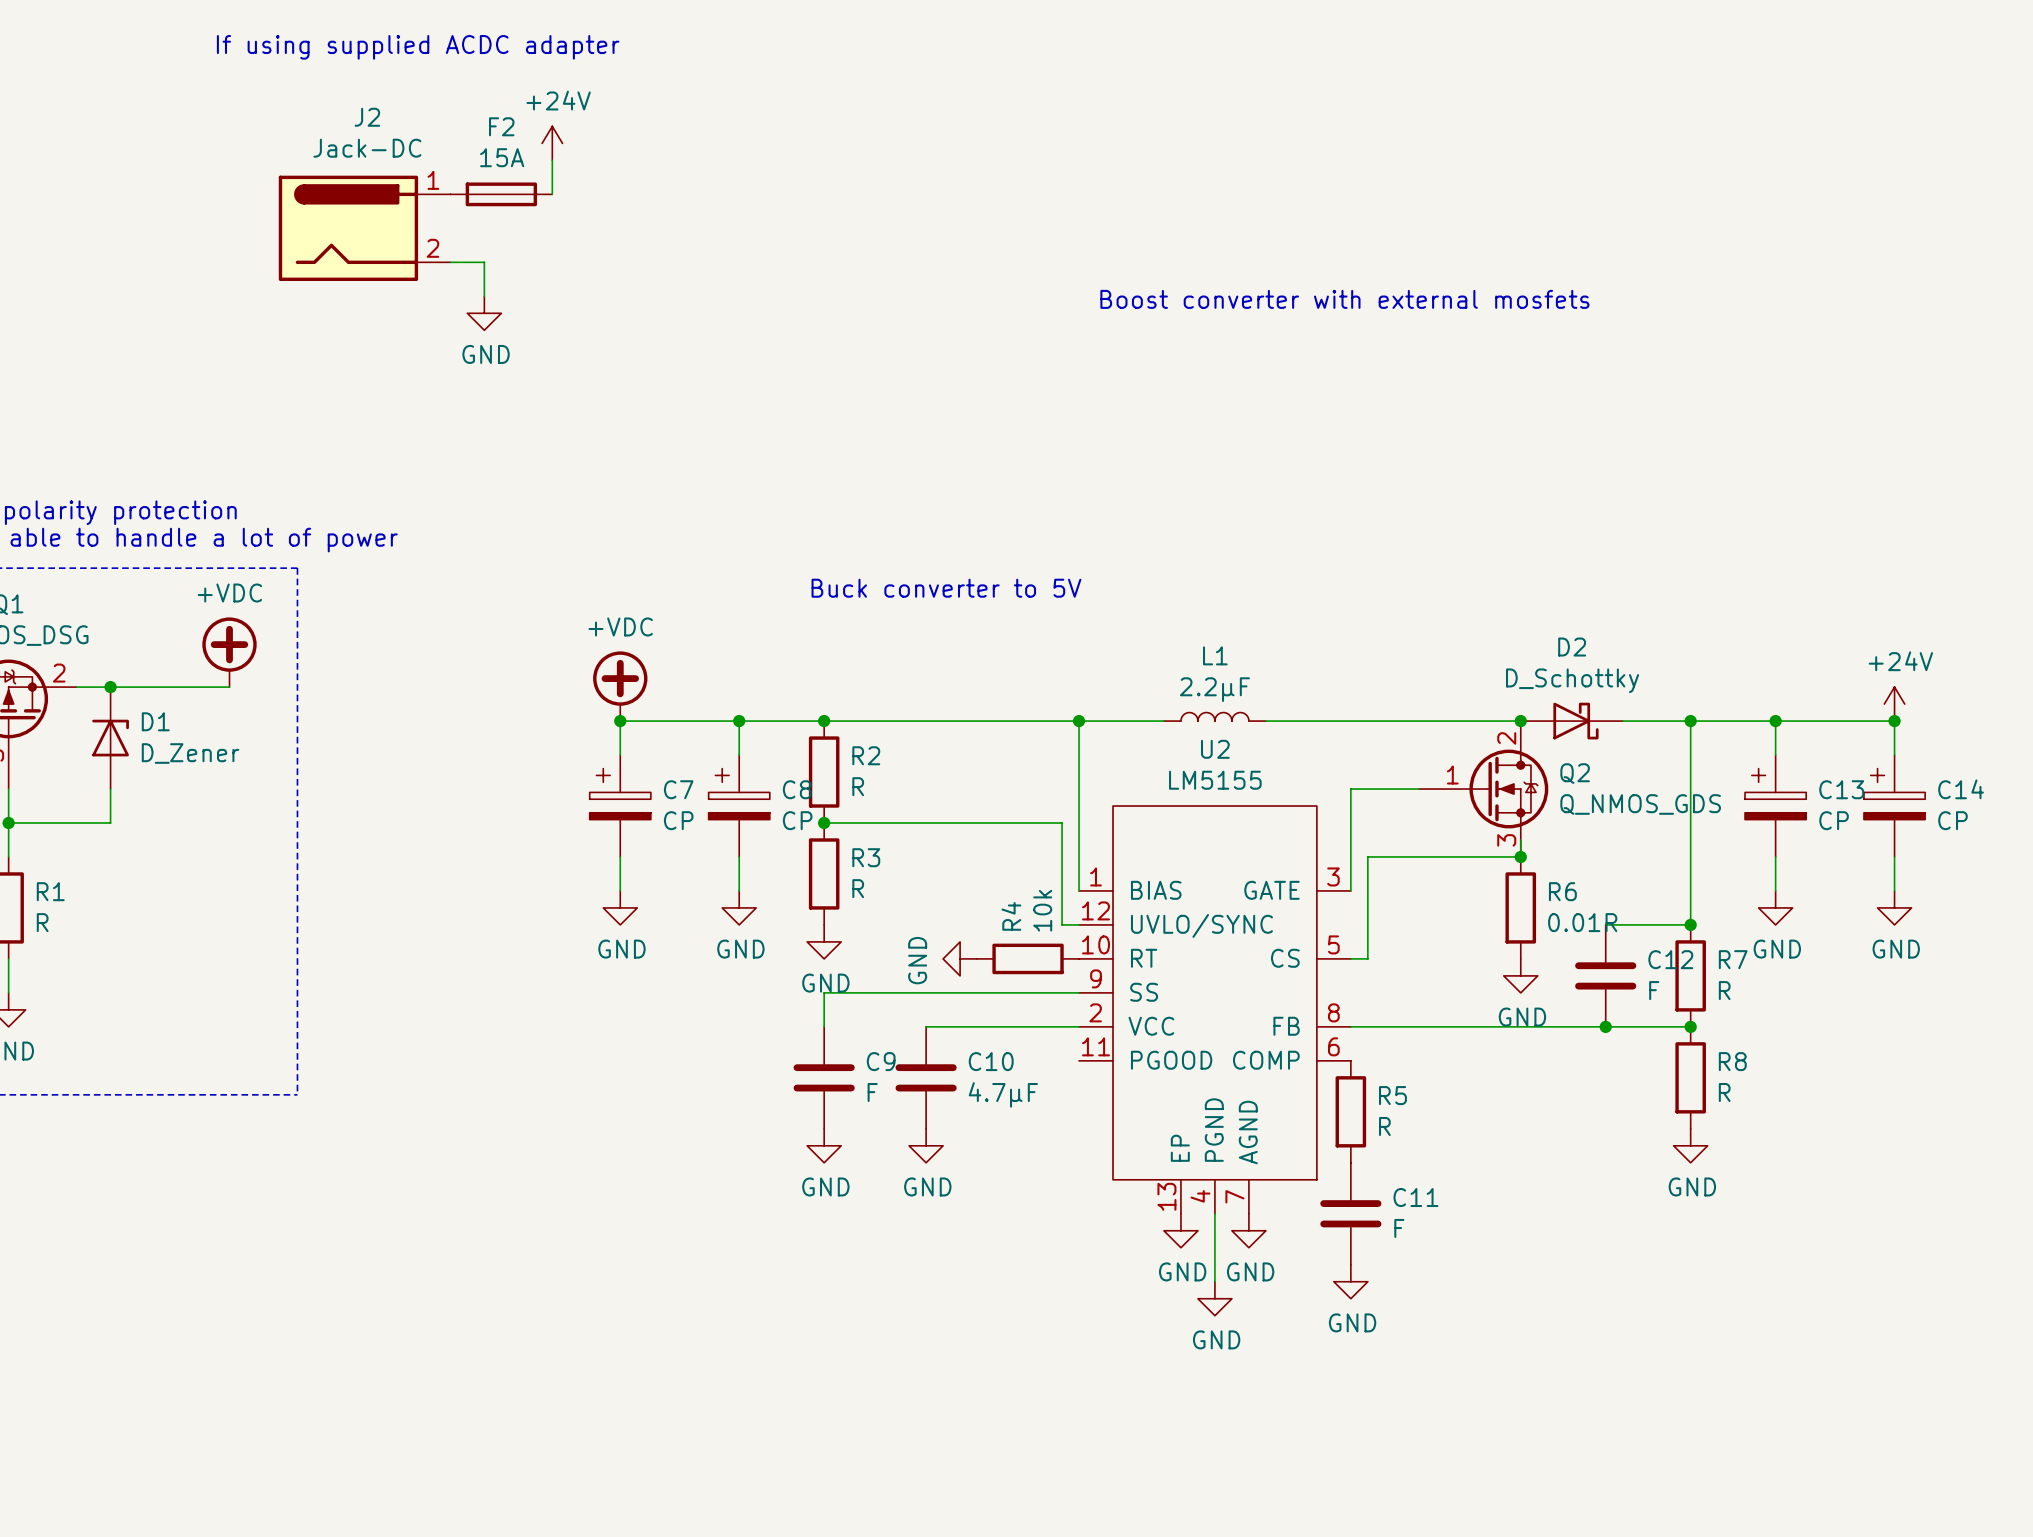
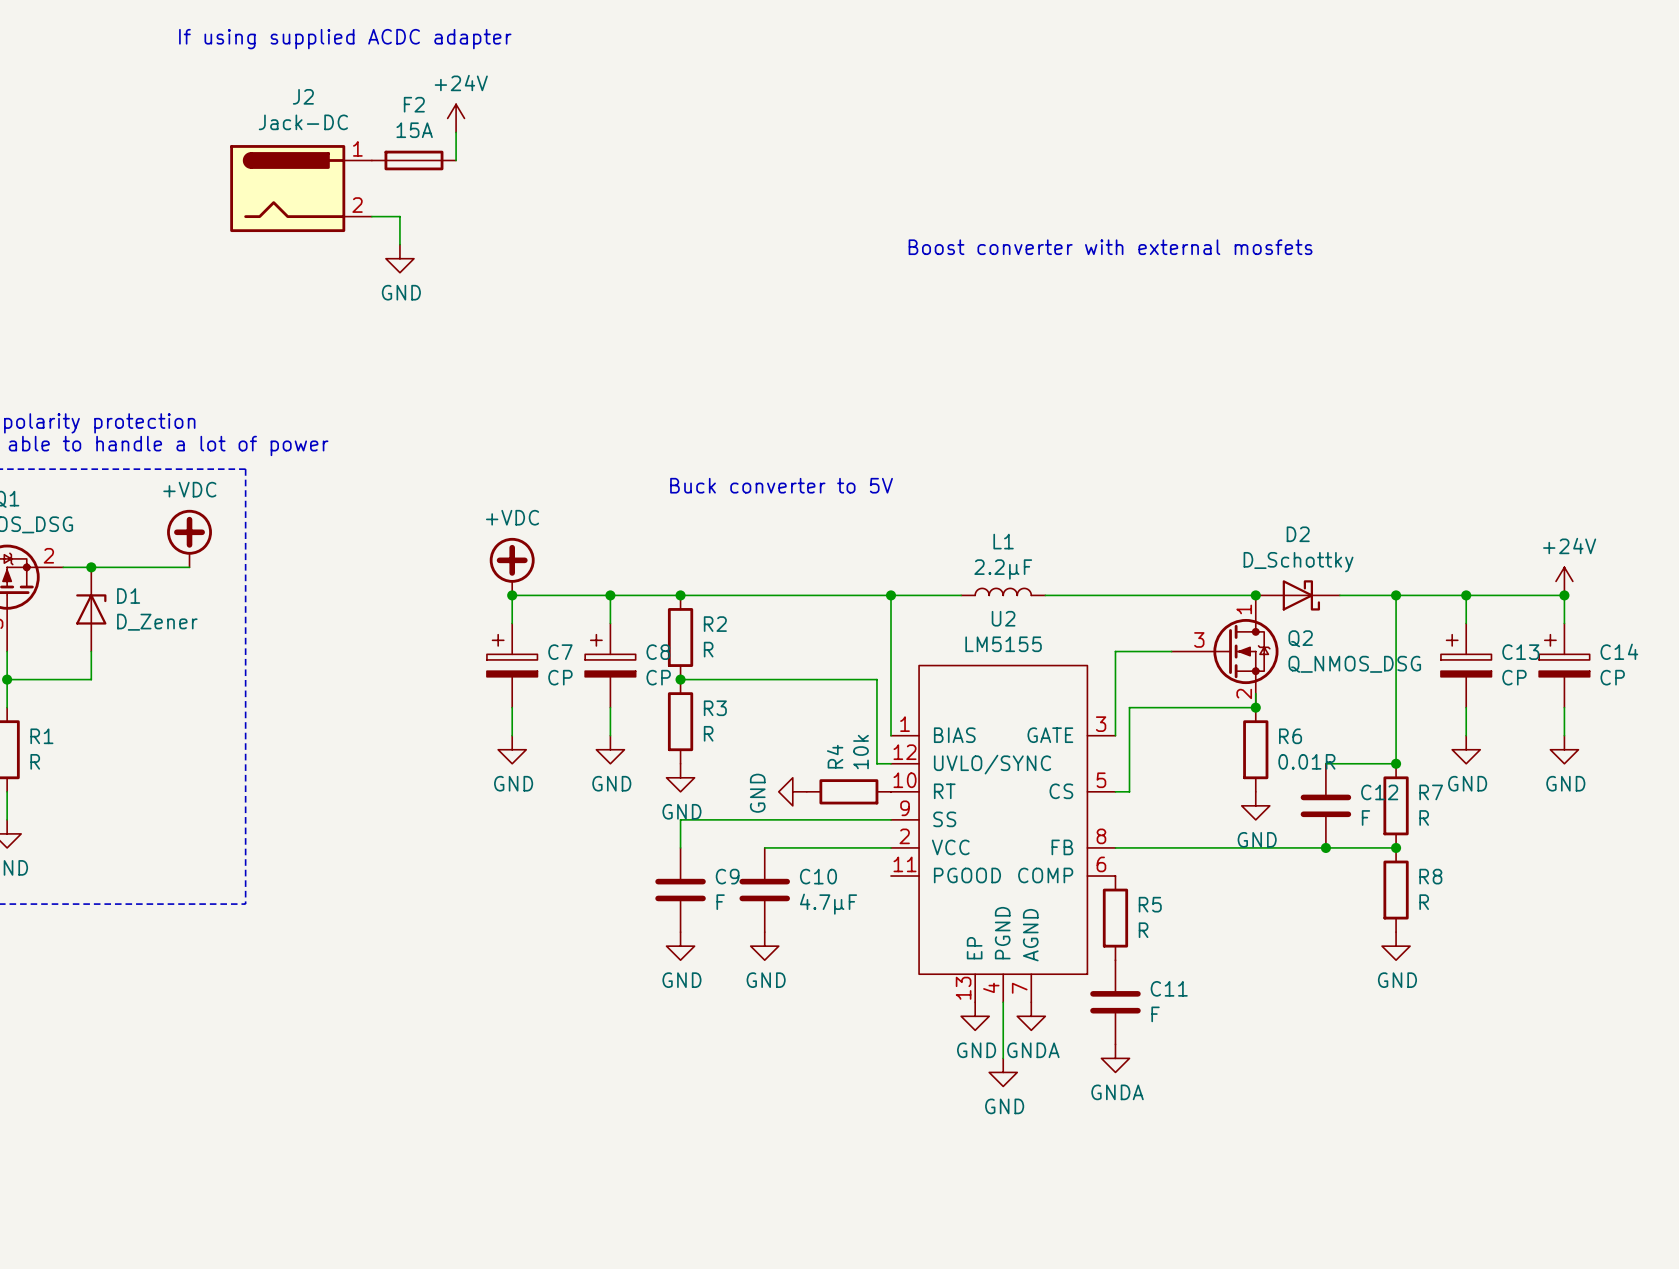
Q2 pin number: 2 (1506, 738) -> 1 (1244, 609)
Q2 pin number: 1 (1452, 775) -> 3 (1199, 639)
Q2 value: Q_NMOS_GDS (1640, 804) -> Q_NMOS_DSG (1354, 664)
Q2 pin number: 3 (1506, 840) -> 2 (1244, 693)
power symbol: GND (1248, 1230) -> GNDA (1031, 1016)
power symbol: GND (1350, 1281) -> GNDA (1115, 1058)

